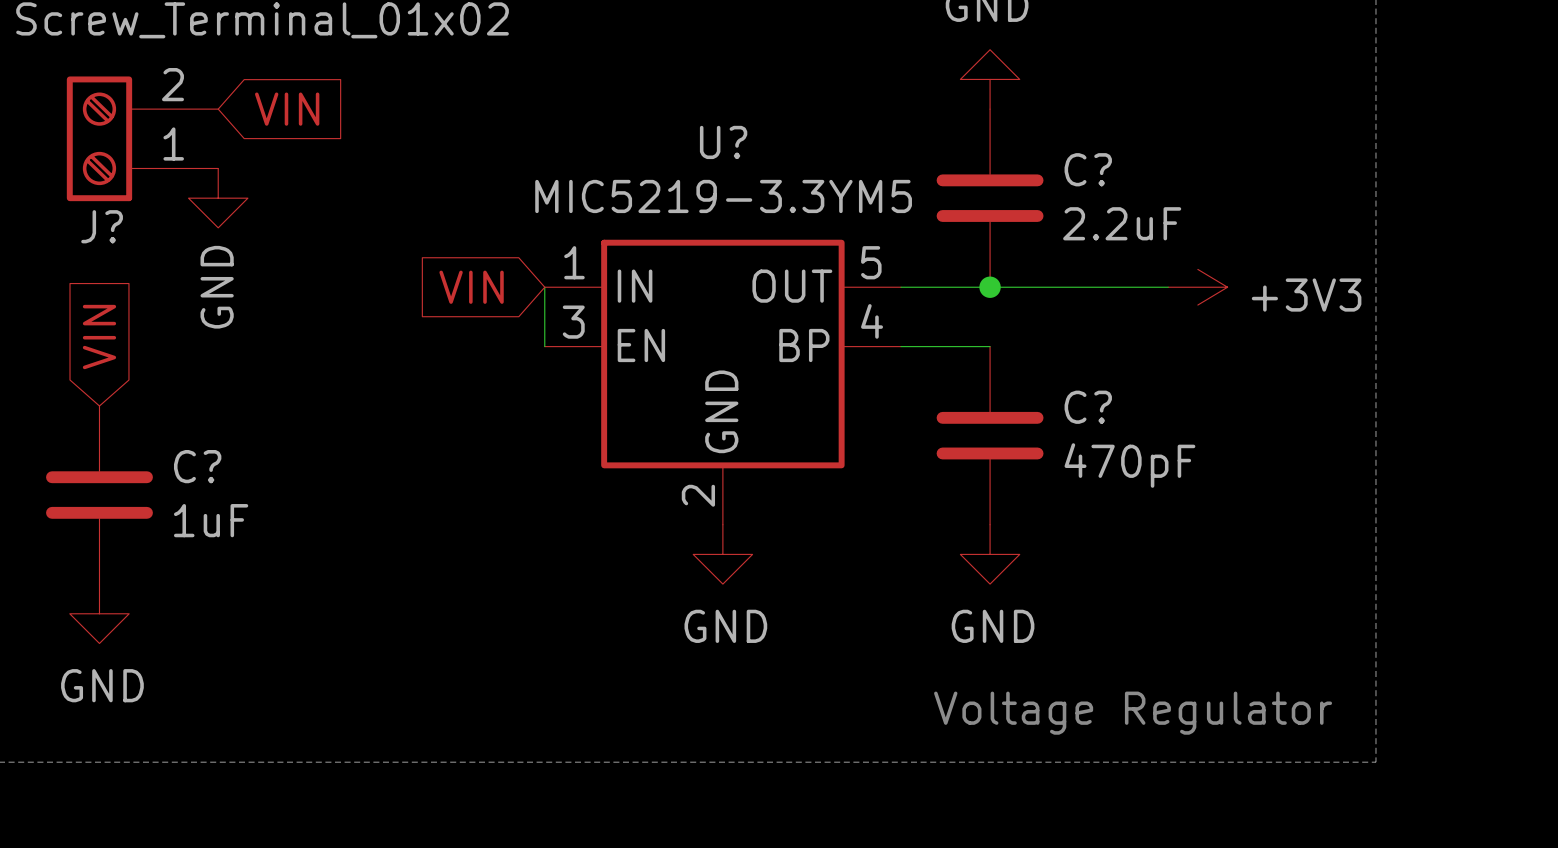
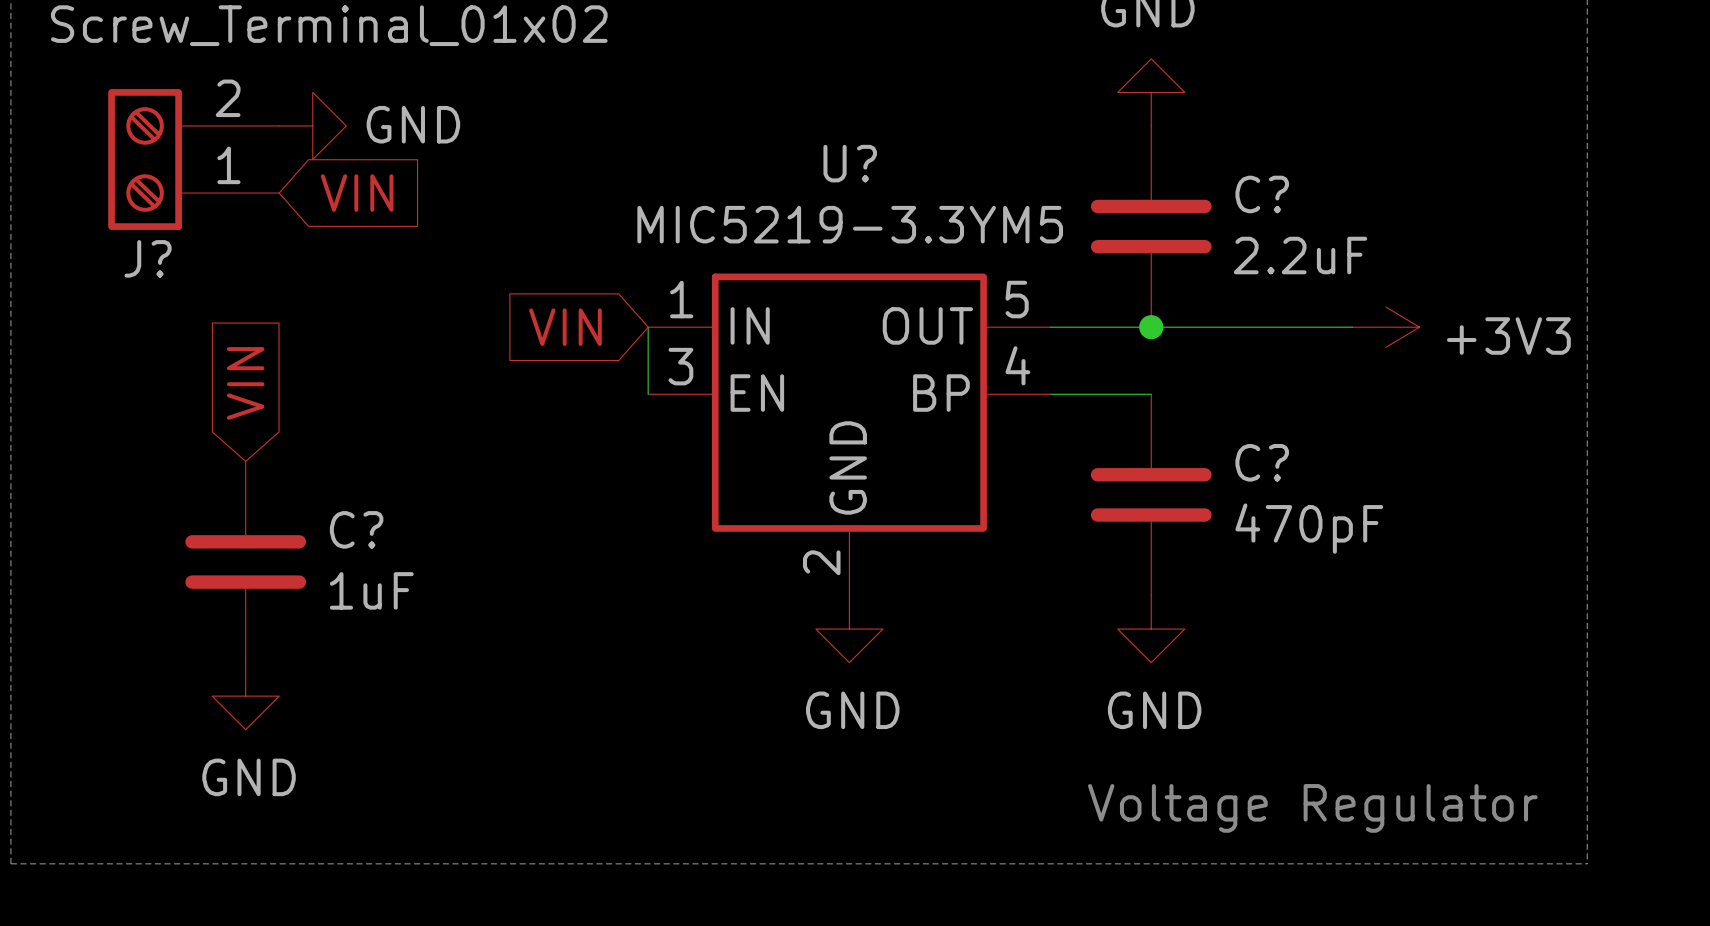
global label position: VIN (287, 109) -> VIN (357, 193)
power symbol rotation: 0° (218, 198) -> 90° counterclockwise (312, 125)
power symbol position: GND (218, 198) -> GND (312, 125)
global label position: VIN (99, 337) -> VIN (245, 383)
C? position: (99, 495) -> (245, 561)
power symbol position: GND (99, 613) -> GND (245, 696)

